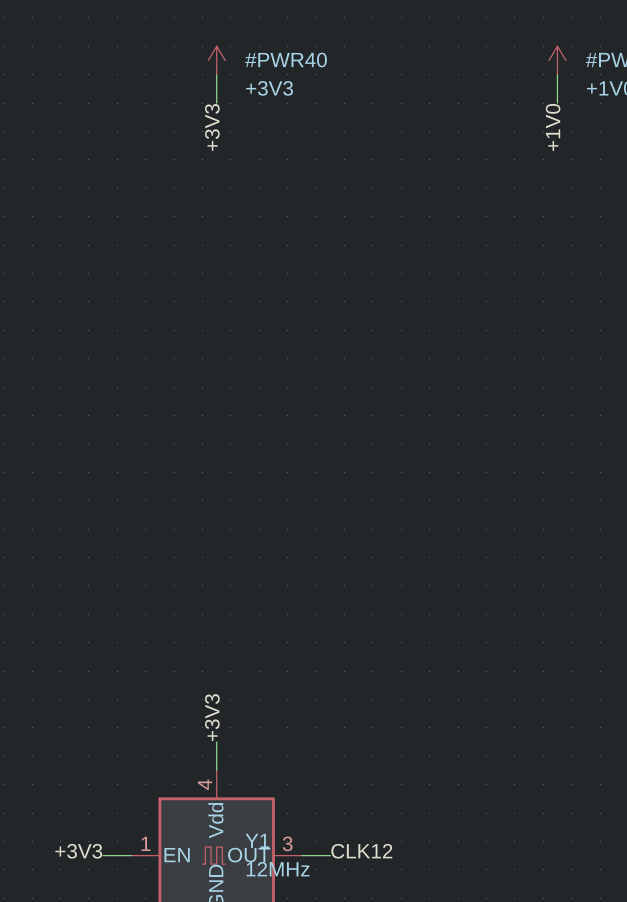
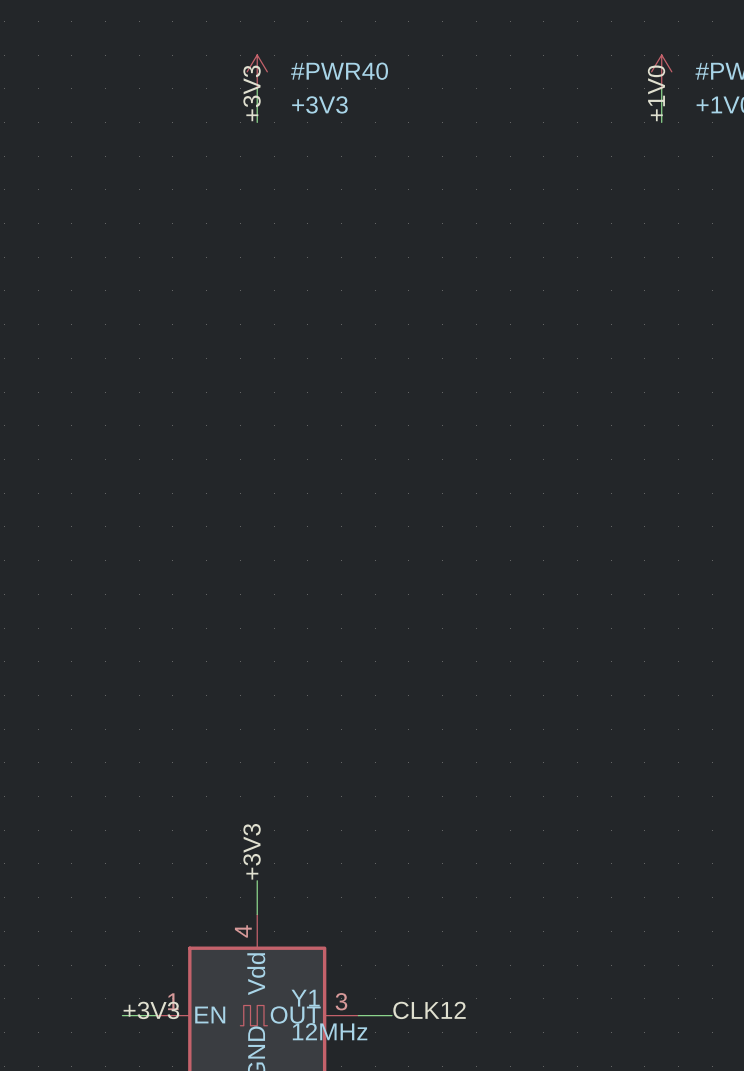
label position: +3V3 (212, 127) -> +3V3 (252, 93)
label position: +1V0 (553, 127) -> +1V0 (656, 93)
label position: +3V3 (78, 851) -> +3V3 (151, 1010)

